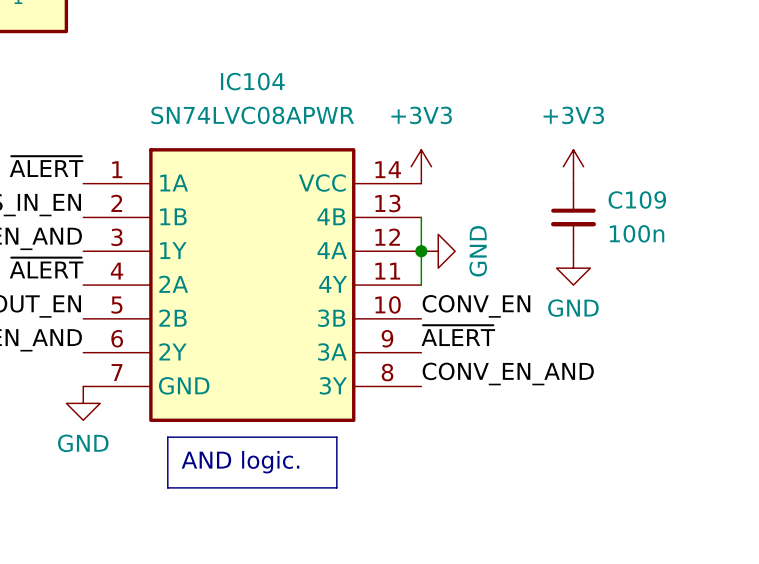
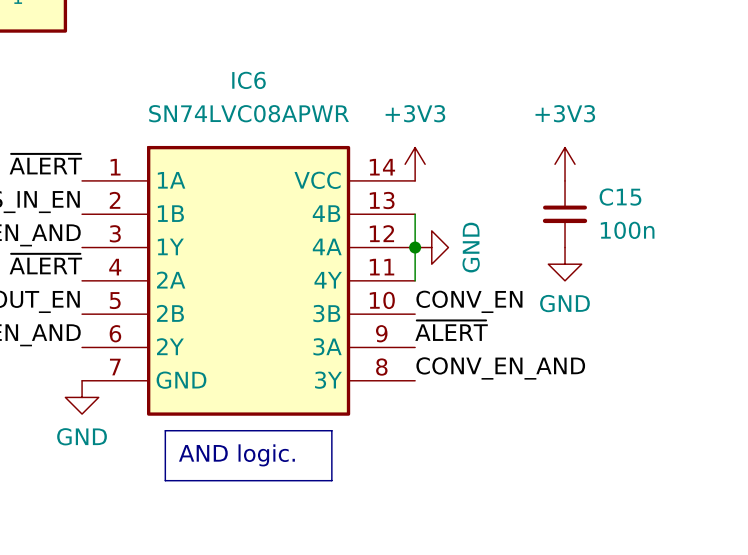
IC104 name: IC104 (252, 81) -> IC6 (248, 80)
C109 name: C109 (637, 200) -> C15 (620, 197)

